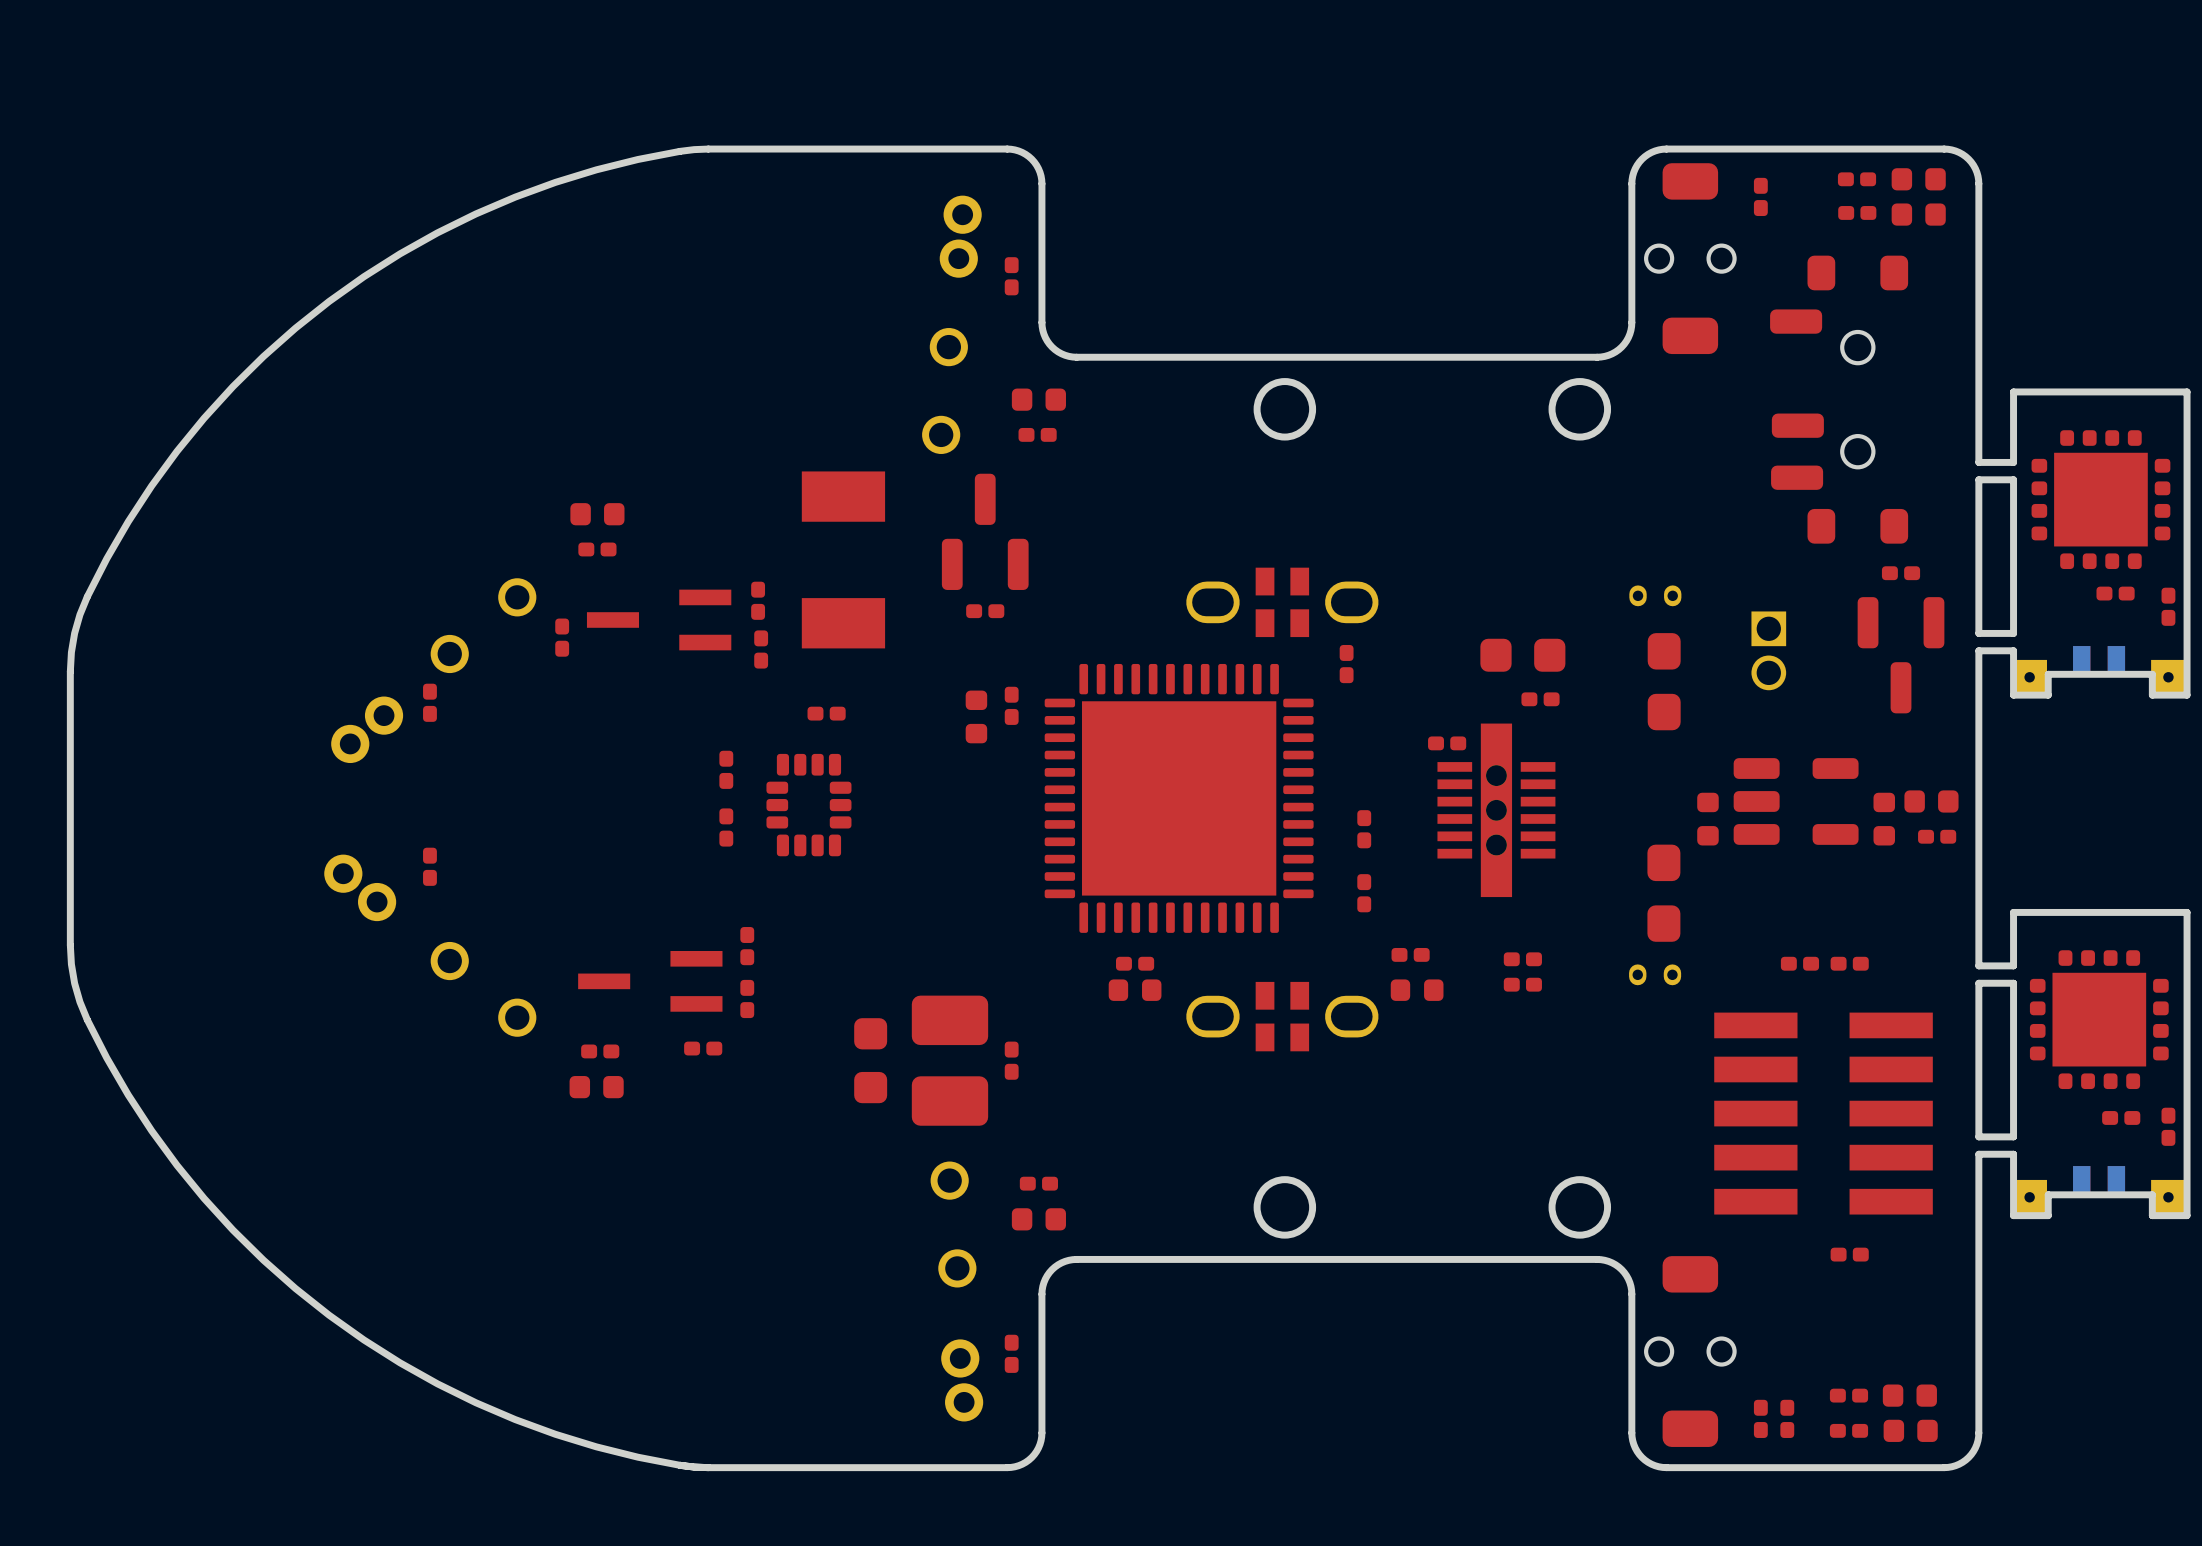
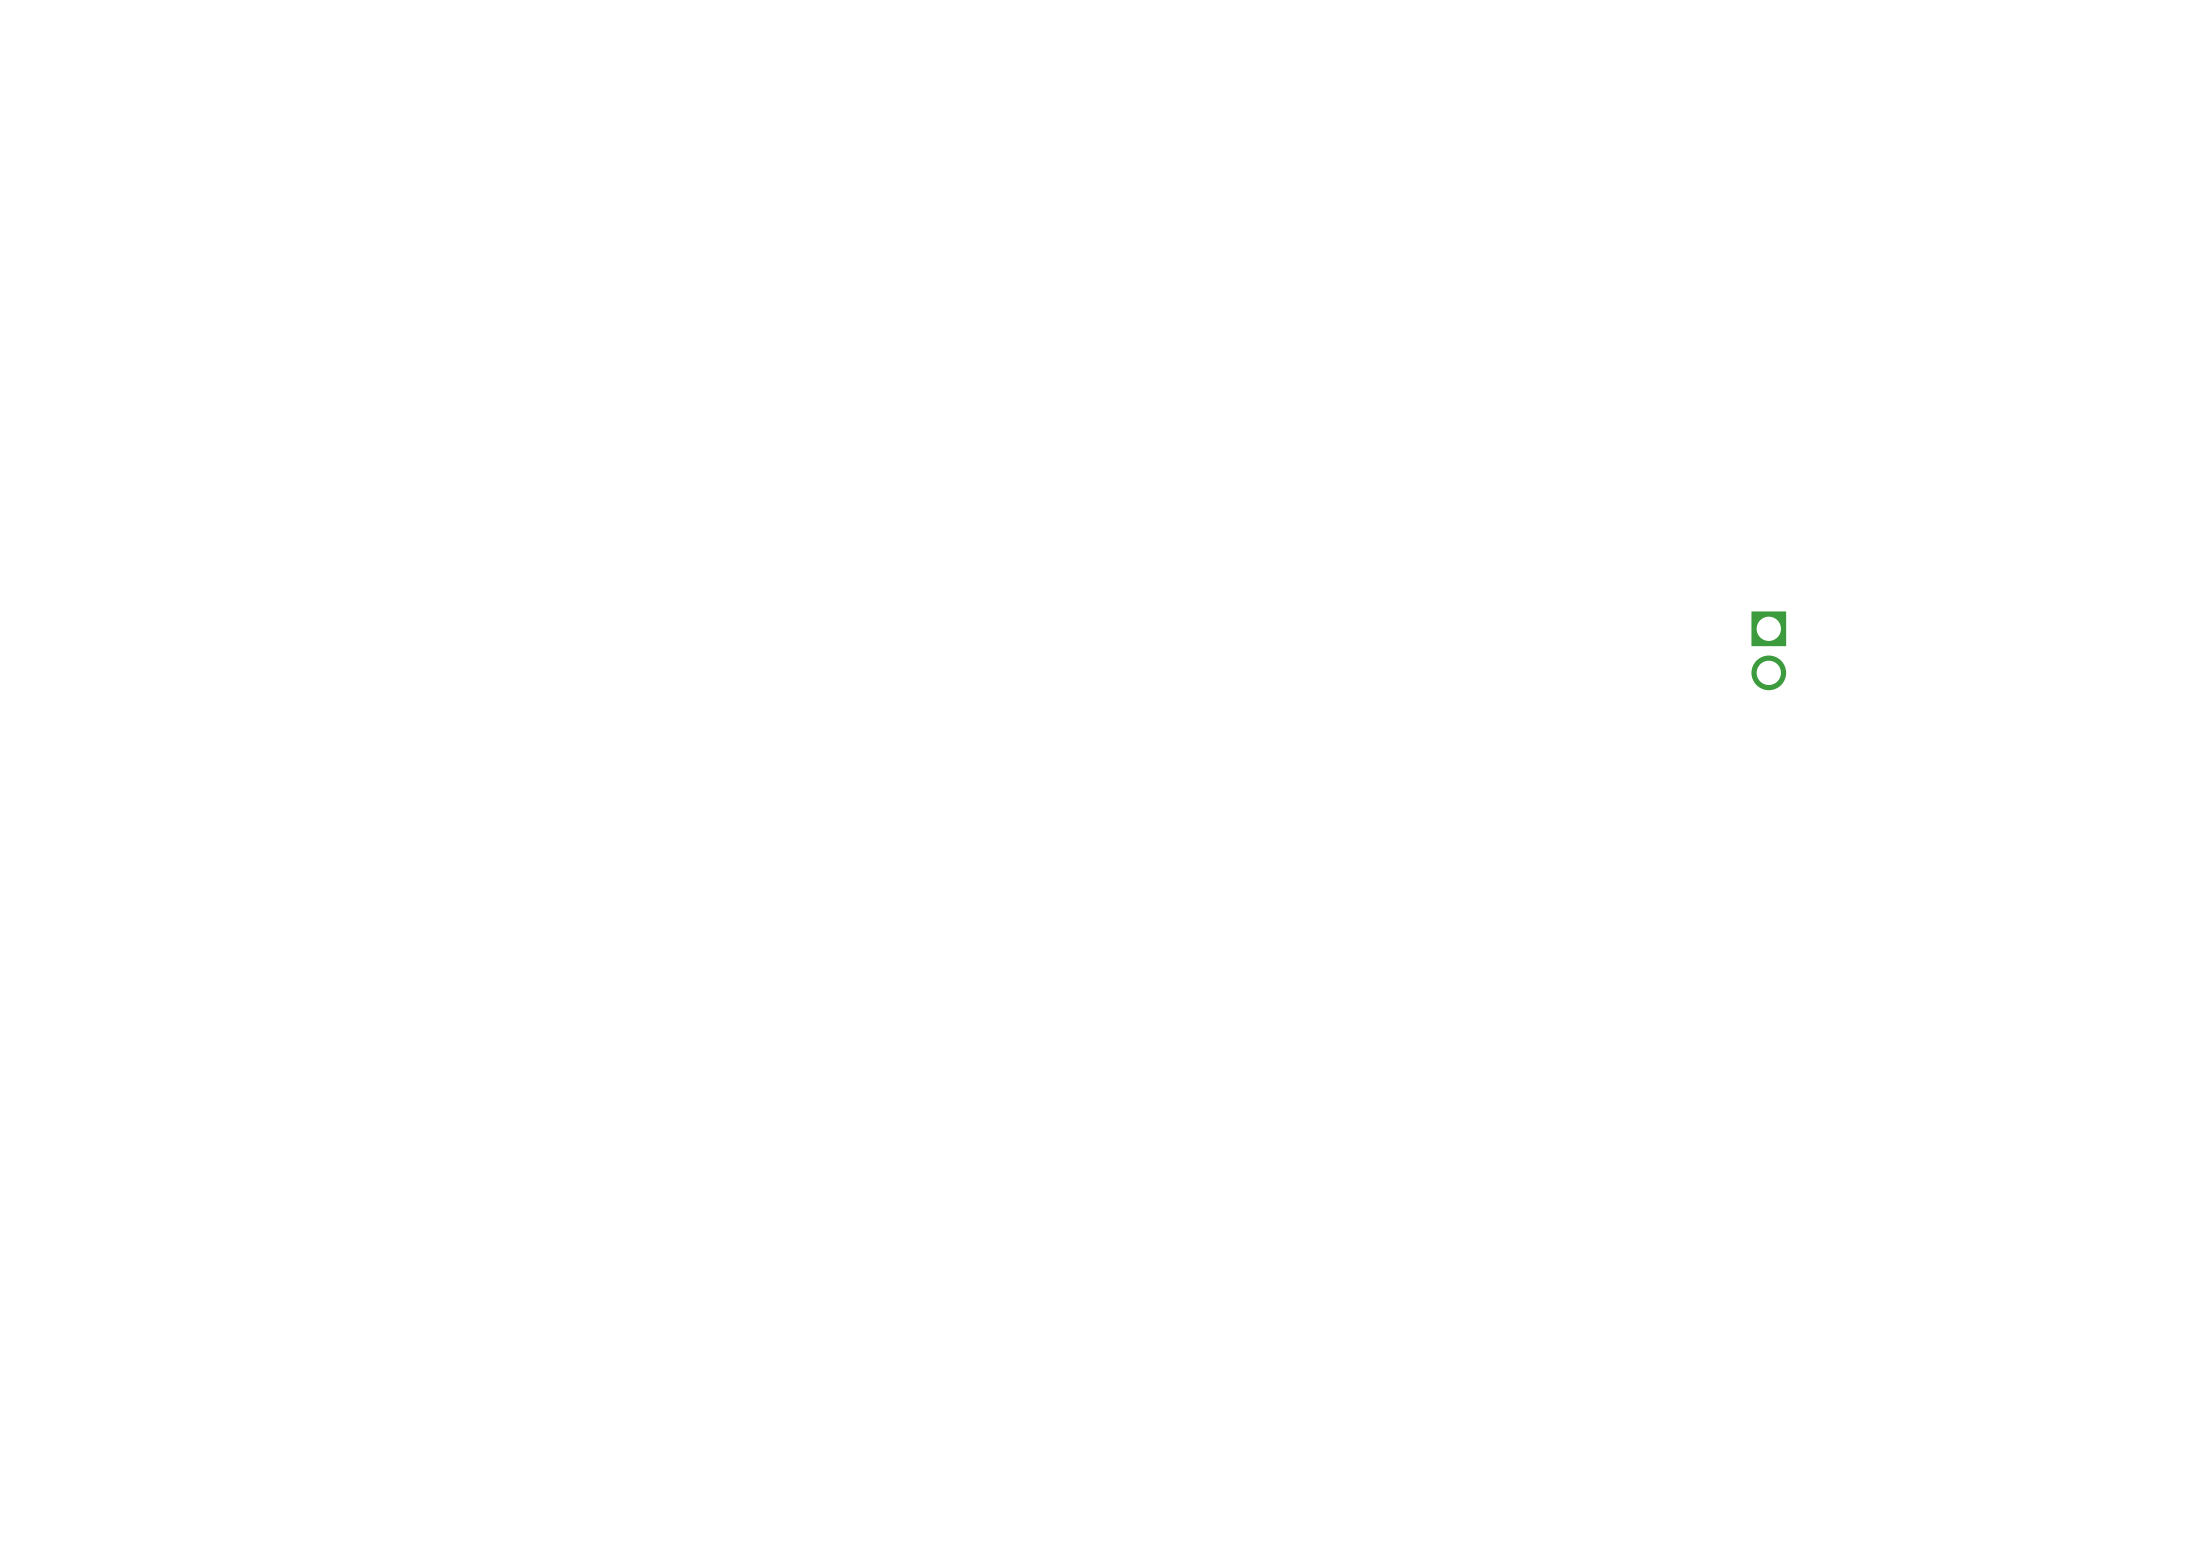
part: (1857, 179) -> none
part: (1918, 179) -> none
part: (1760, 196) -> none
part: (1857, 212) -> none
part: (1918, 214) -> none
part: (960, 236) -> none
part: (1690, 258) -> none
part: (1011, 276) -> none
round board edge: [1253, 378, 1317, 441] -> none
round board edge: [1548, 378, 1612, 441] -> none
part: (945, 391) -> none
part: (1038, 399) -> none
part: (1839, 399) -> none
part: (1037, 434) -> none
board edge: (2013, 479) (2013, 633) (1978, 633) (1978, 479) (2013, 479) -> none
part: (2100, 499) -> none
part: (597, 514) -> none
part: (985, 531) -> none
part: (597, 549) -> none
part: (843, 559) -> none
part: (1901, 573) -> none
part: (2115, 593) -> none
part: (1655, 595) -> none
part: (758, 600) -> none
part: (1282, 602) -> none
part: (2168, 606) -> none
part: (985, 611) -> none
part: (659, 619) -> none
part: (483, 625) -> none
part: (562, 637) -> none
part: (761, 649) -> none
part: (1522, 655) -> none
part: (1901, 655) -> none
part: (1346, 664) -> none
part: (2099, 670) -> none
part: (1664, 681) -> none
part: (1540, 699) -> none
part: (429, 702) -> none
part: (1011, 705) -> none
part: (826, 713) -> none
part: (976, 716) -> none
part: (367, 729) -> none
part: (1447, 743) -> none
part: (726, 769) -> none
part: (1179, 798) -> none
part: (1796, 801) -> none
part: (1931, 801) -> none
part: (808, 805) -> none
part: (1496, 810) -> none
part: (1707, 819) -> none
part: (1884, 819) -> none
part: (726, 827) -> none
part: (1364, 829) -> none
part: (1937, 836) -> none
part: (429, 866) -> none
part: (360, 887) -> none
part: (1364, 893) -> none
part: (1663, 893) -> none
part: (747, 946) -> none
part: (1410, 954) -> none
part: (1522, 959) -> none
part: (1135, 963) -> none
part: (1799, 963) -> none
part: (1849, 963) -> none
part: (1655, 974) -> none
part: (650, 981) -> none
board edge: (2013, 983) (2013, 1136) (1978, 1136) (1978, 983) (2013, 983) -> none
part: (1522, 984) -> none
part: (483, 989) -> none
part: (1135, 990) -> none
part: (1417, 990) -> none
part: (747, 998) -> none
part: (1282, 1016) -> none
part: (2099, 1019) -> none
part: (703, 1048) -> none
part: (600, 1051) -> none
part: (870, 1060) -> none
part: (949, 1060) -> none
part: (1011, 1060) -> none
part: (596, 1087) -> none
part: (1823, 1113) -> none
part: (2121, 1117) -> none
part: (2168, 1126) -> none
round board edge: [1253, 1176, 1317, 1239] -> none
round board edge: [1548, 1176, 1612, 1239] -> none
part: (1038, 1183) -> none
part: (2099, 1190) -> none
part: (1038, 1219) -> none
part: (953, 1224) -> none
part: (1849, 1254) -> none
part: (1690, 1351) -> none
part: (1011, 1353) -> none
part: (962, 1380) -> none
part: (1848, 1395) -> none
part: (1909, 1395) -> none
part: (1760, 1418) -> none
part: (1787, 1418) -> none
part: (1848, 1430) -> none
part: (1910, 1430) -> none
board edge: (680, 1465) (708, 1467) -> none
board edge: (680, 1465) (708, 1467) -> none
board edge: (680, 1465) (596, 1446) (515, 1419) (475, 1402) (400, 1362) (329, 1315) (263, 1260) (232, 1230) (177, 1165) (128, 1094) (106, 1057) (79, 1001) (74, 983) (70, 945) (70, 671) (74, 633) (79, 614) (106, 558) (128, 521) (177, 451) (232, 386) (295, 328) (329, 301) (400, 253) (475, 213) (555, 182) (637, 159) (680, 151) (708, 149) (1007, 149) (1018, 150) (1028, 156) (1036, 165) (1041, 176) (1042, 326) (1049, 344) (1065, 355) (1076, 357) (1601, 357) (1618, 349) (1626, 341) (1630, 330) (1632, 179) (1637, 165) (1648, 154) (1666, 149) (1944, 149) (1955, 150) (1965, 156) (1973, 165) (1978, 179) (1978, 462) (2013, 462) (2013, 391) (2187, 391) (2187, 695) (2152, 695) (2152, 674) (2048, 674) (2048, 695) (2013, 695) (2013, 650) (1978, 650) (1978, 965) (2013, 965) (2013, 912) (2187, 912) (2187, 1215) (2152, 1215) (2152, 1194) (2048, 1194) (2048, 1215) (2013, 1215) (2013, 1154) (1978, 1154) (1978, 1432) (1975, 1448) (1965, 1460) (1955, 1465) (1944, 1467) (1666, 1467) (1648, 1462) (1637, 1451) (1632, 1436) (1630, 1286) (1621, 1269) (1604, 1260) (1076, 1259) (1065, 1261) (1055, 1267) (1047, 1275) (1042, 1286) (1041, 1436) (1036, 1451) (1025, 1462) (1007, 1467) (708, 1467) -> none

